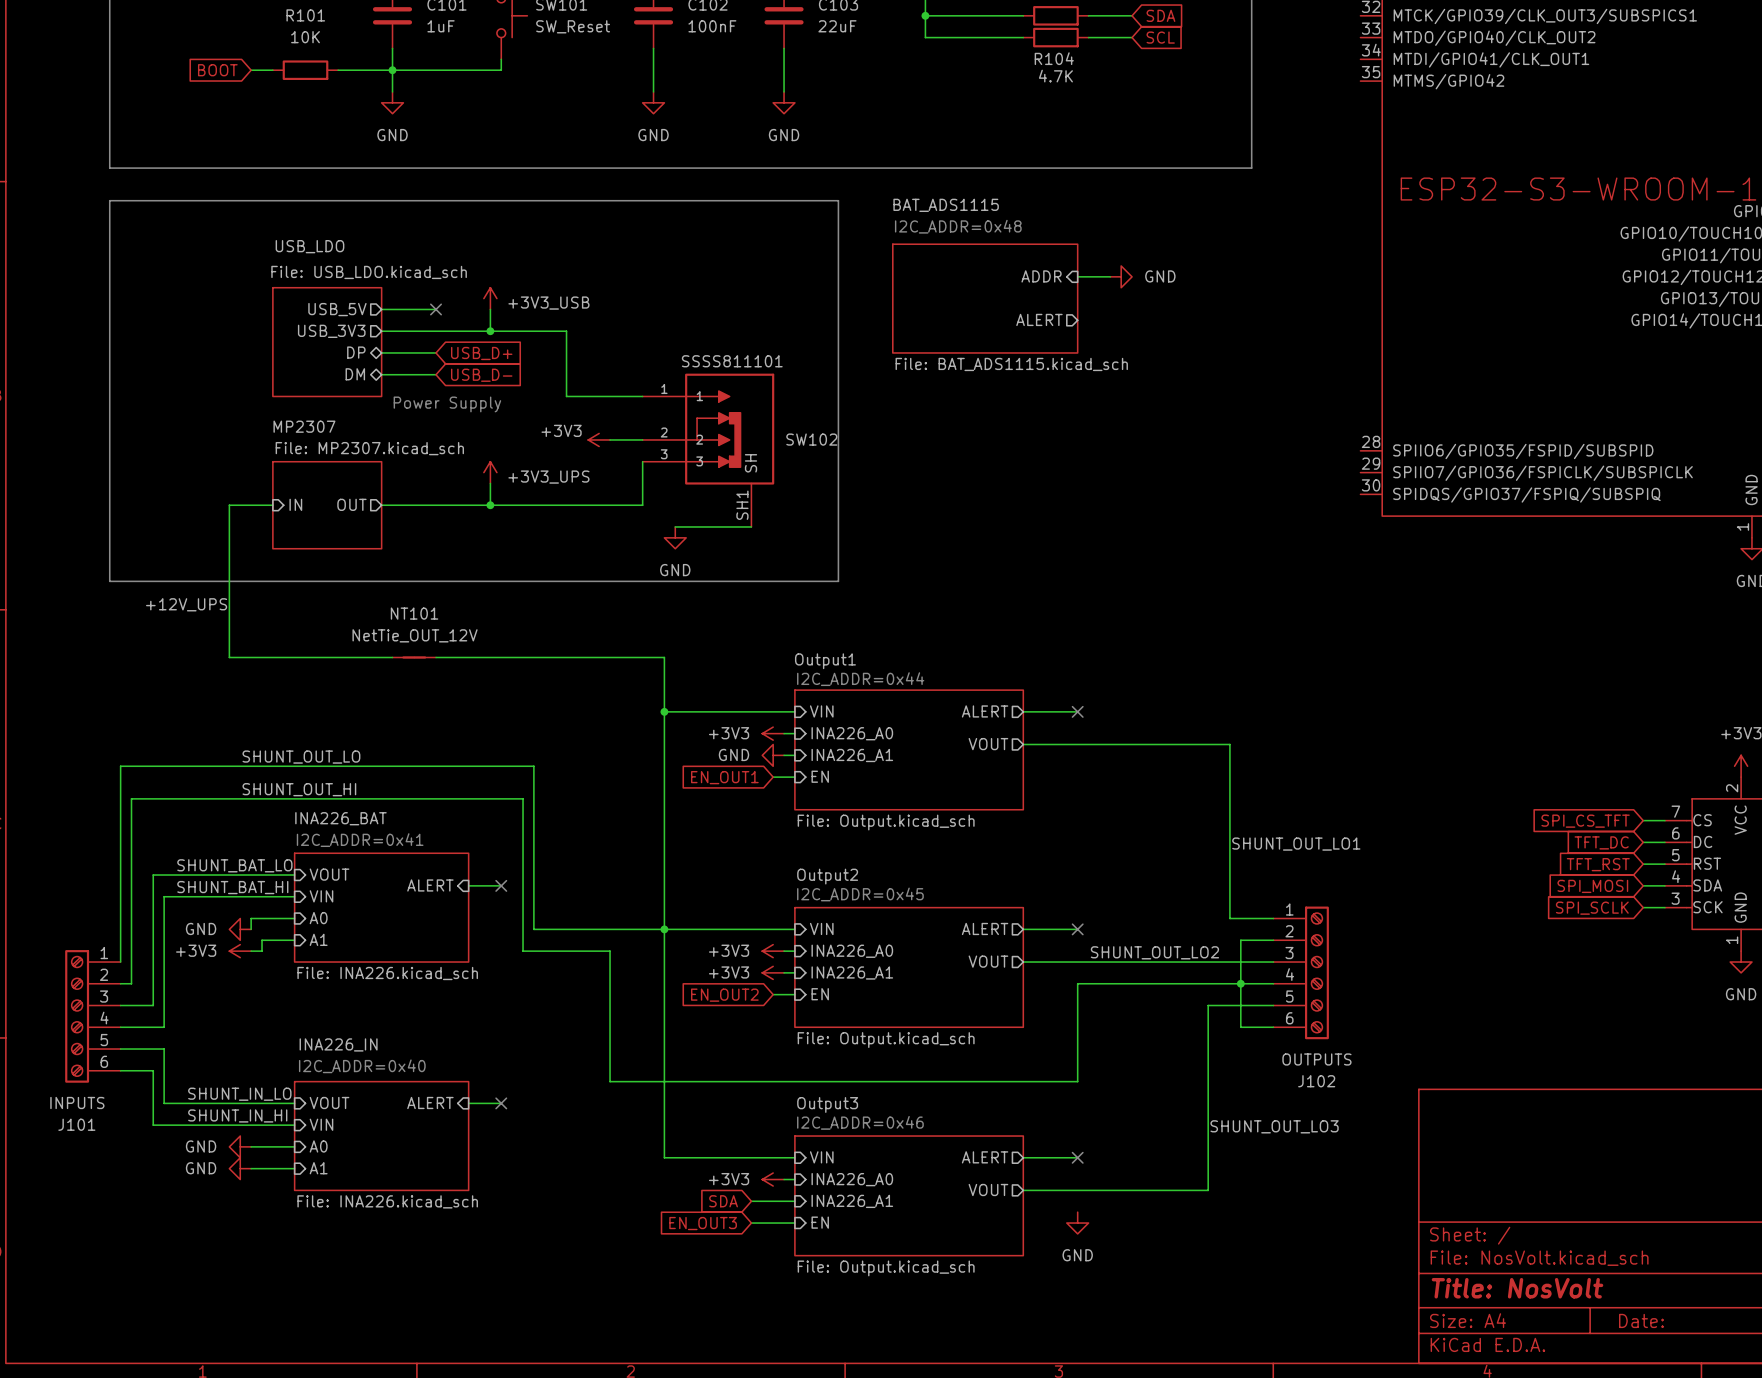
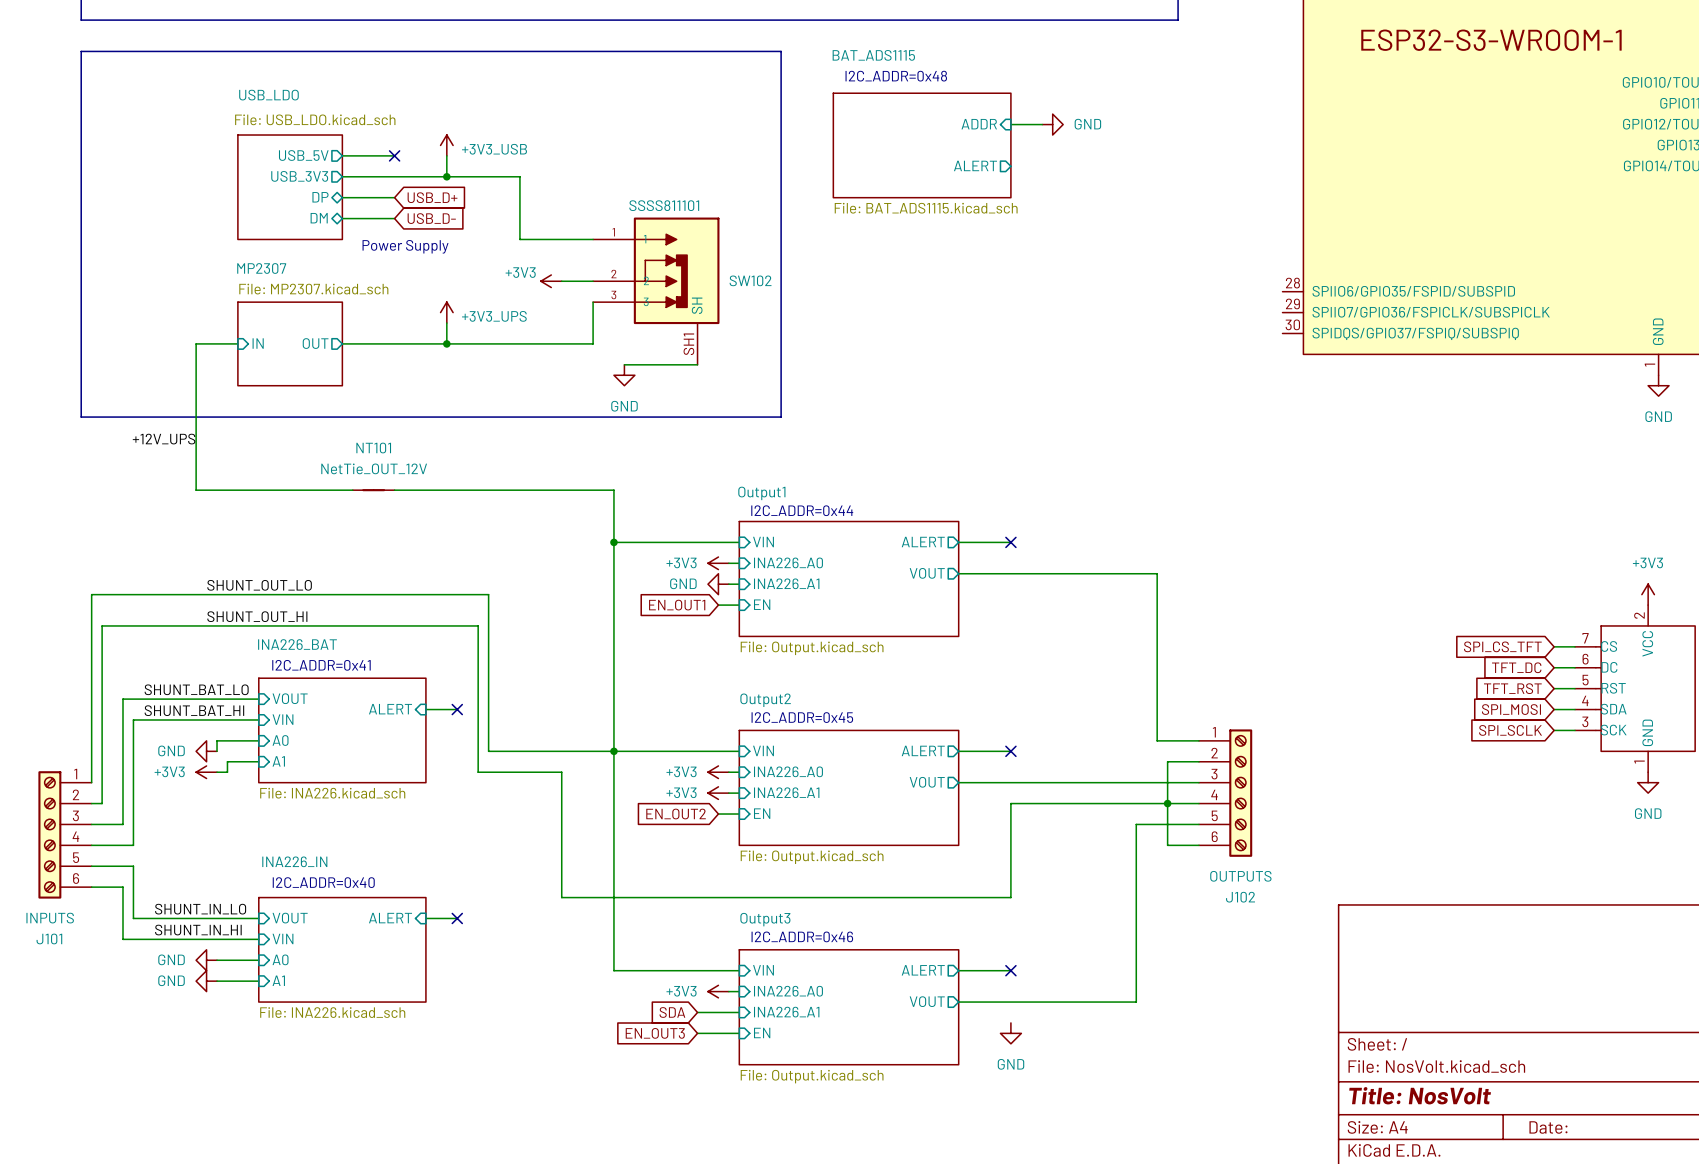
label: SHUNT_OUT_LO1 (1296, 844) -> none
label: SHUNT_OUT_LO2 (1154, 952) -> none
label: SHUNT_OUT_LO3 (1274, 1126) -> none

